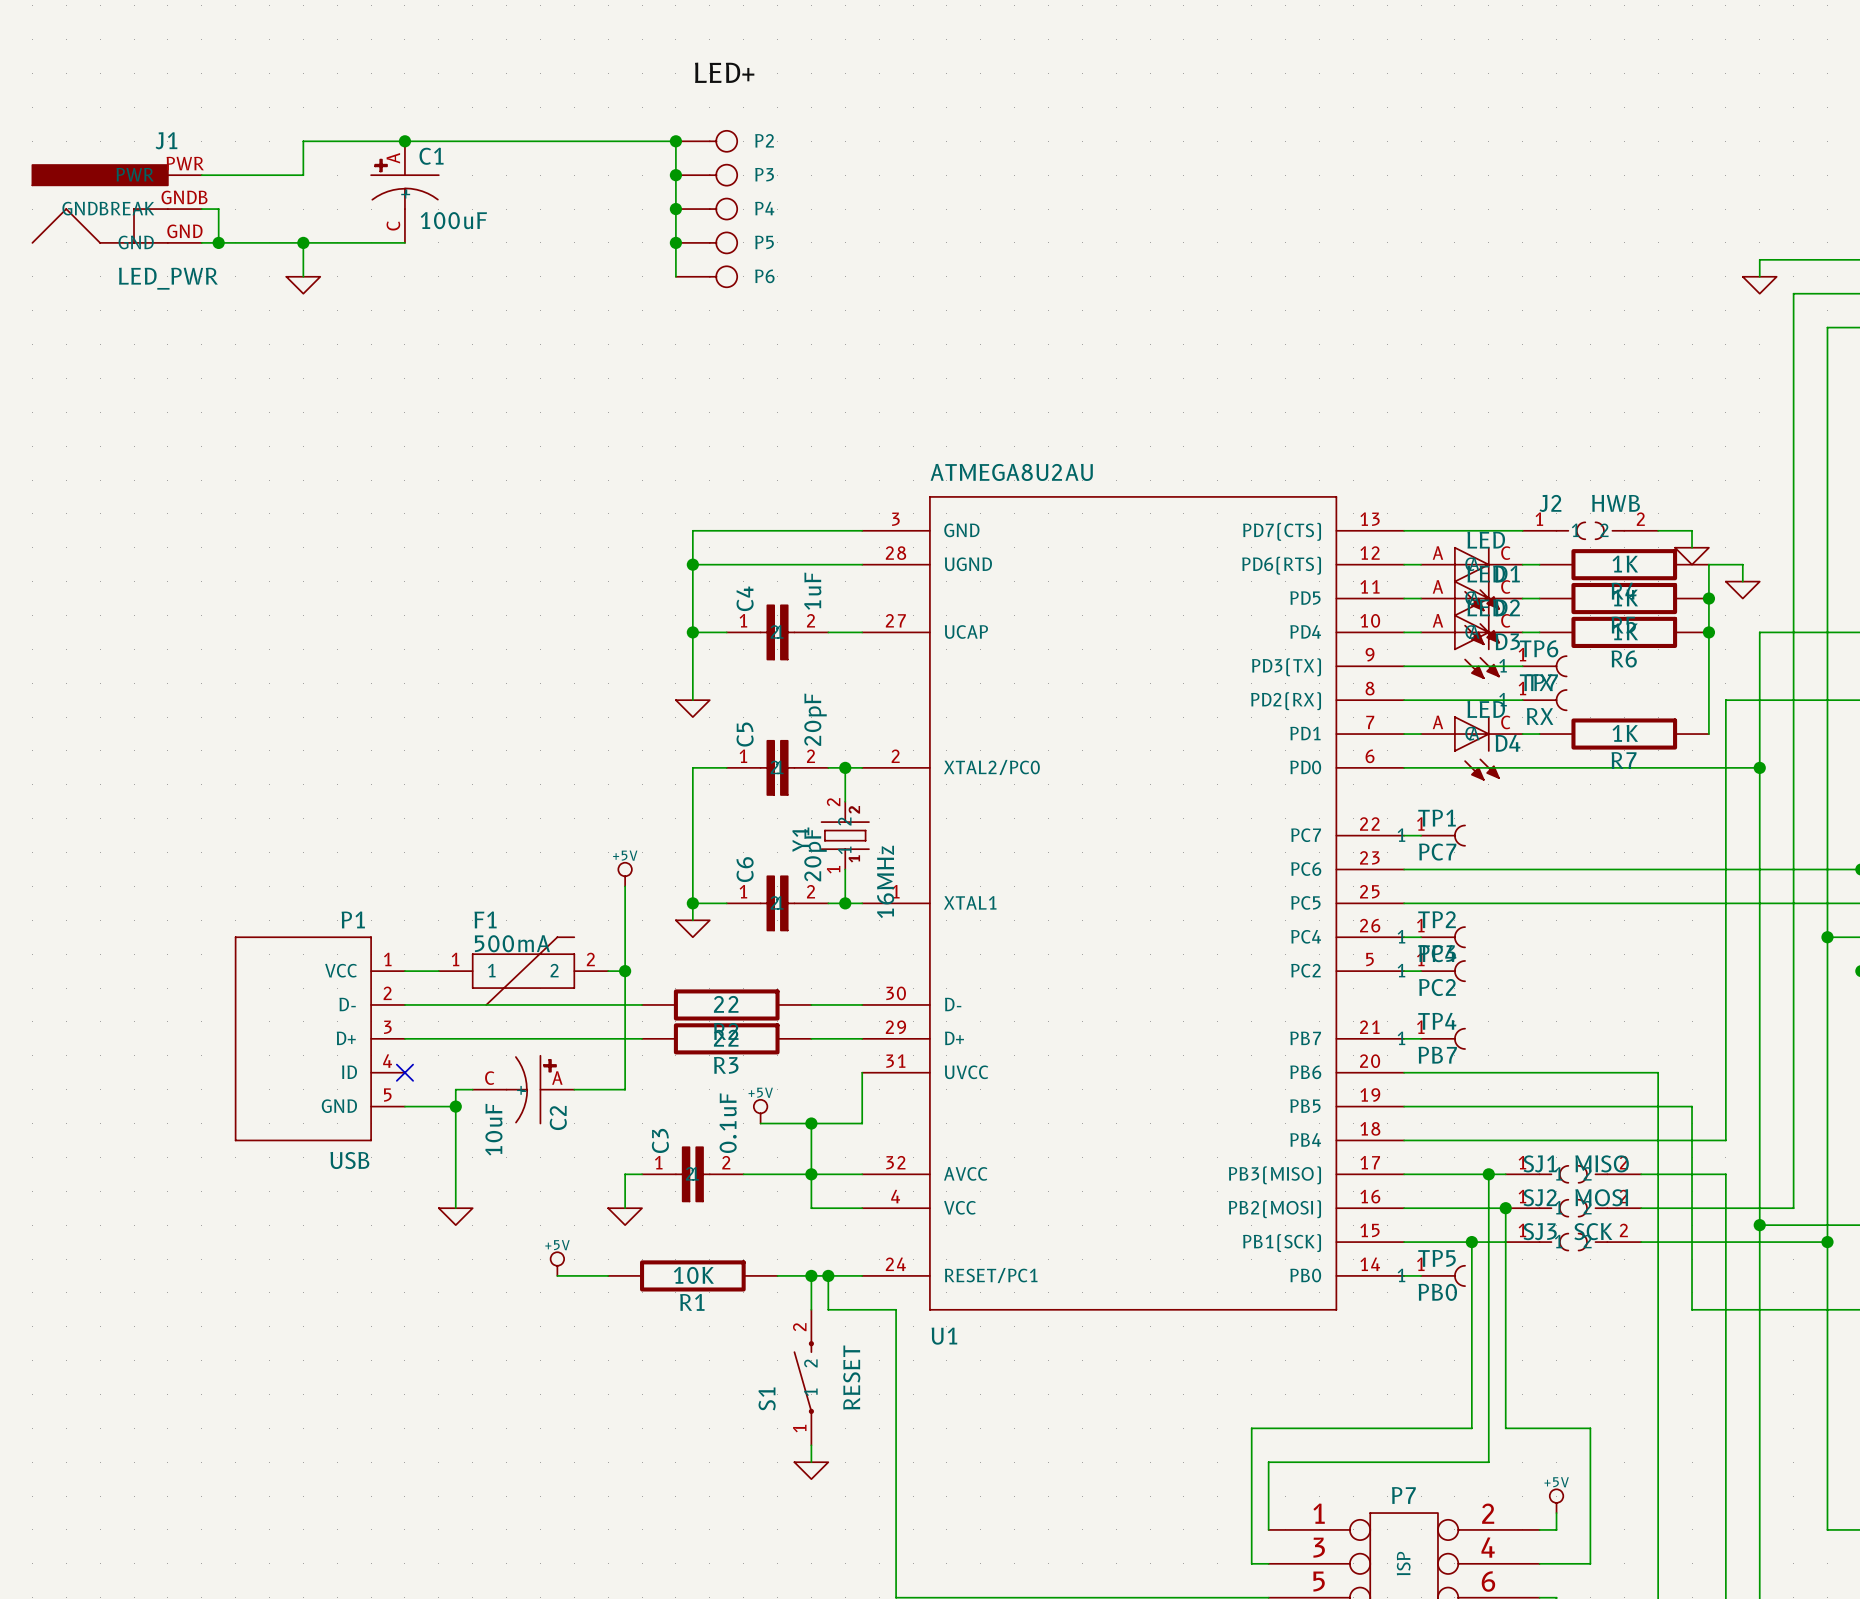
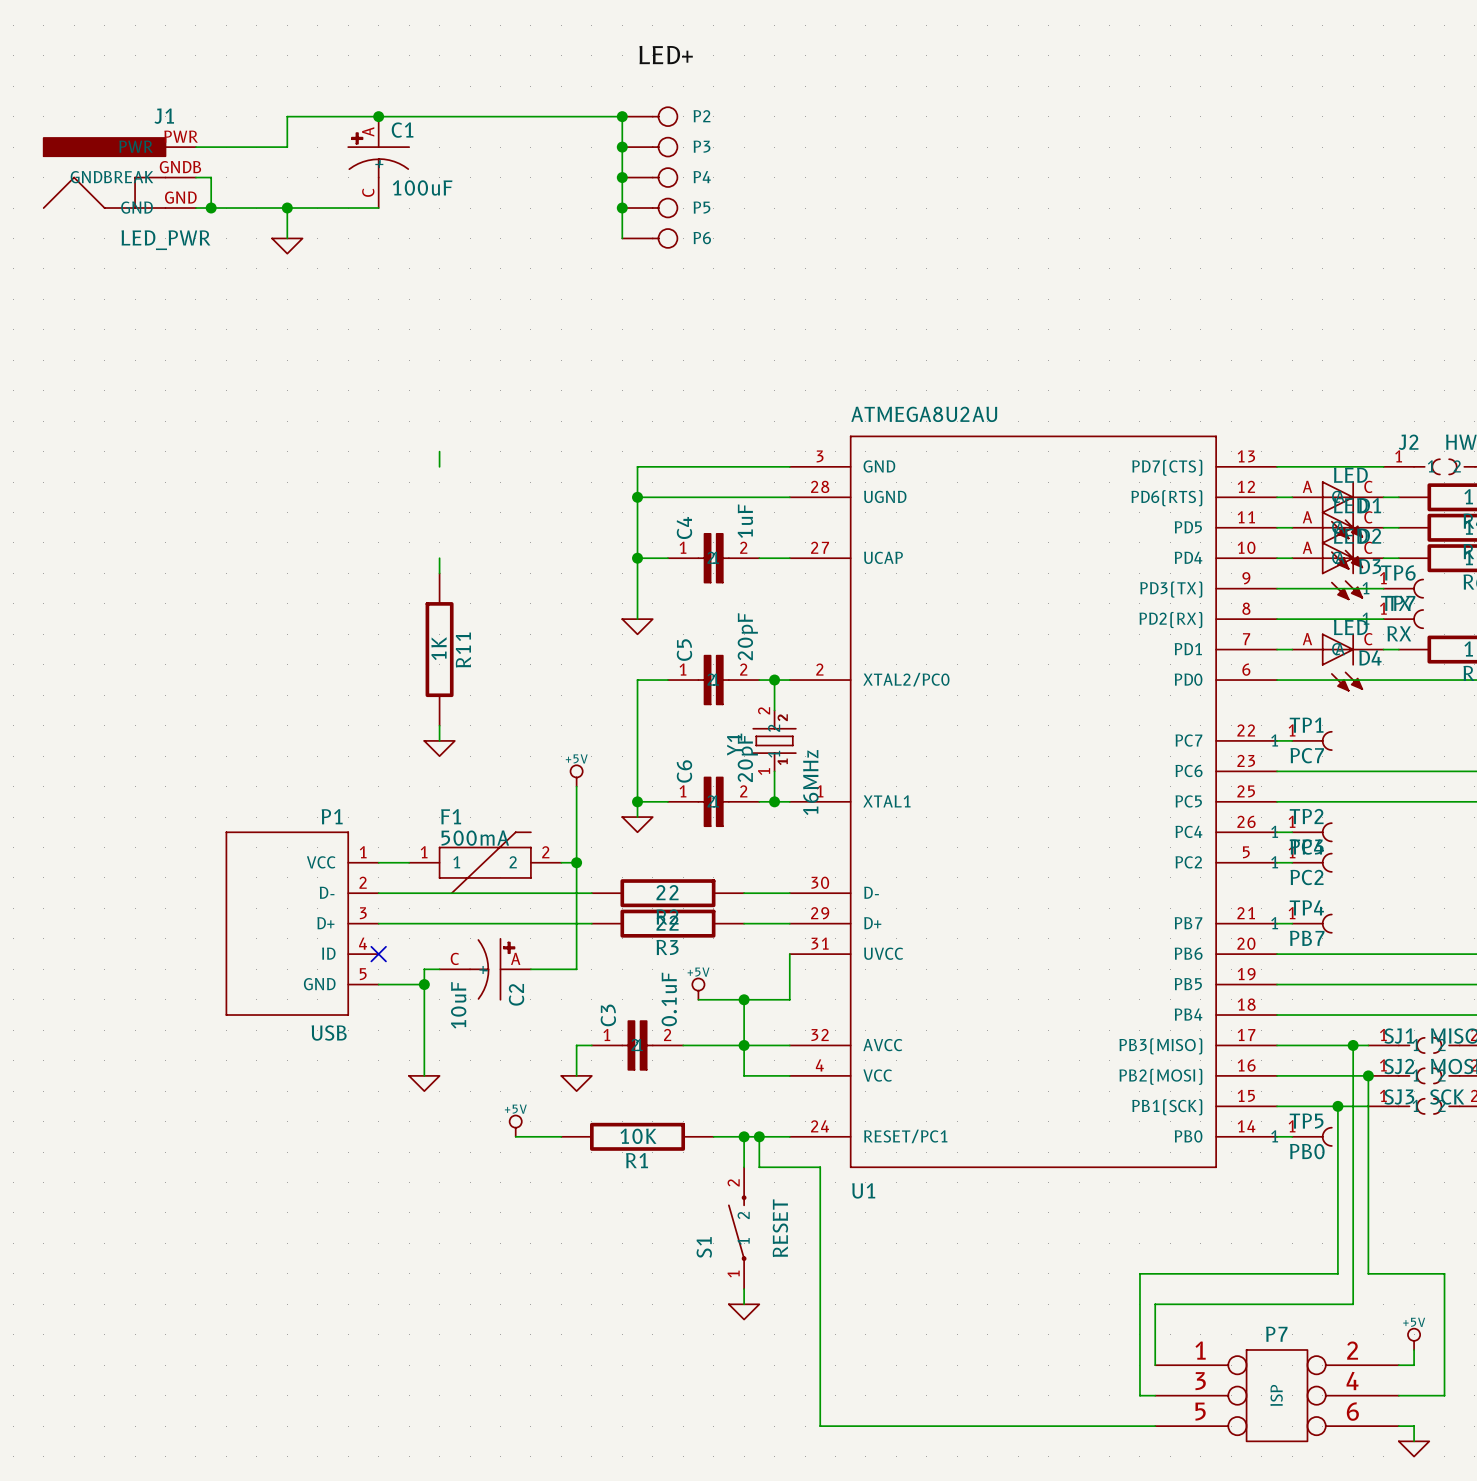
wire: none -> (439, 451) (439, 466)
wire: none -> (439, 558) (439, 573)
R11: none -> 1K (439, 649)
wire: none -> (439, 725) (439, 740)
power symbol: none -> (439, 748)

